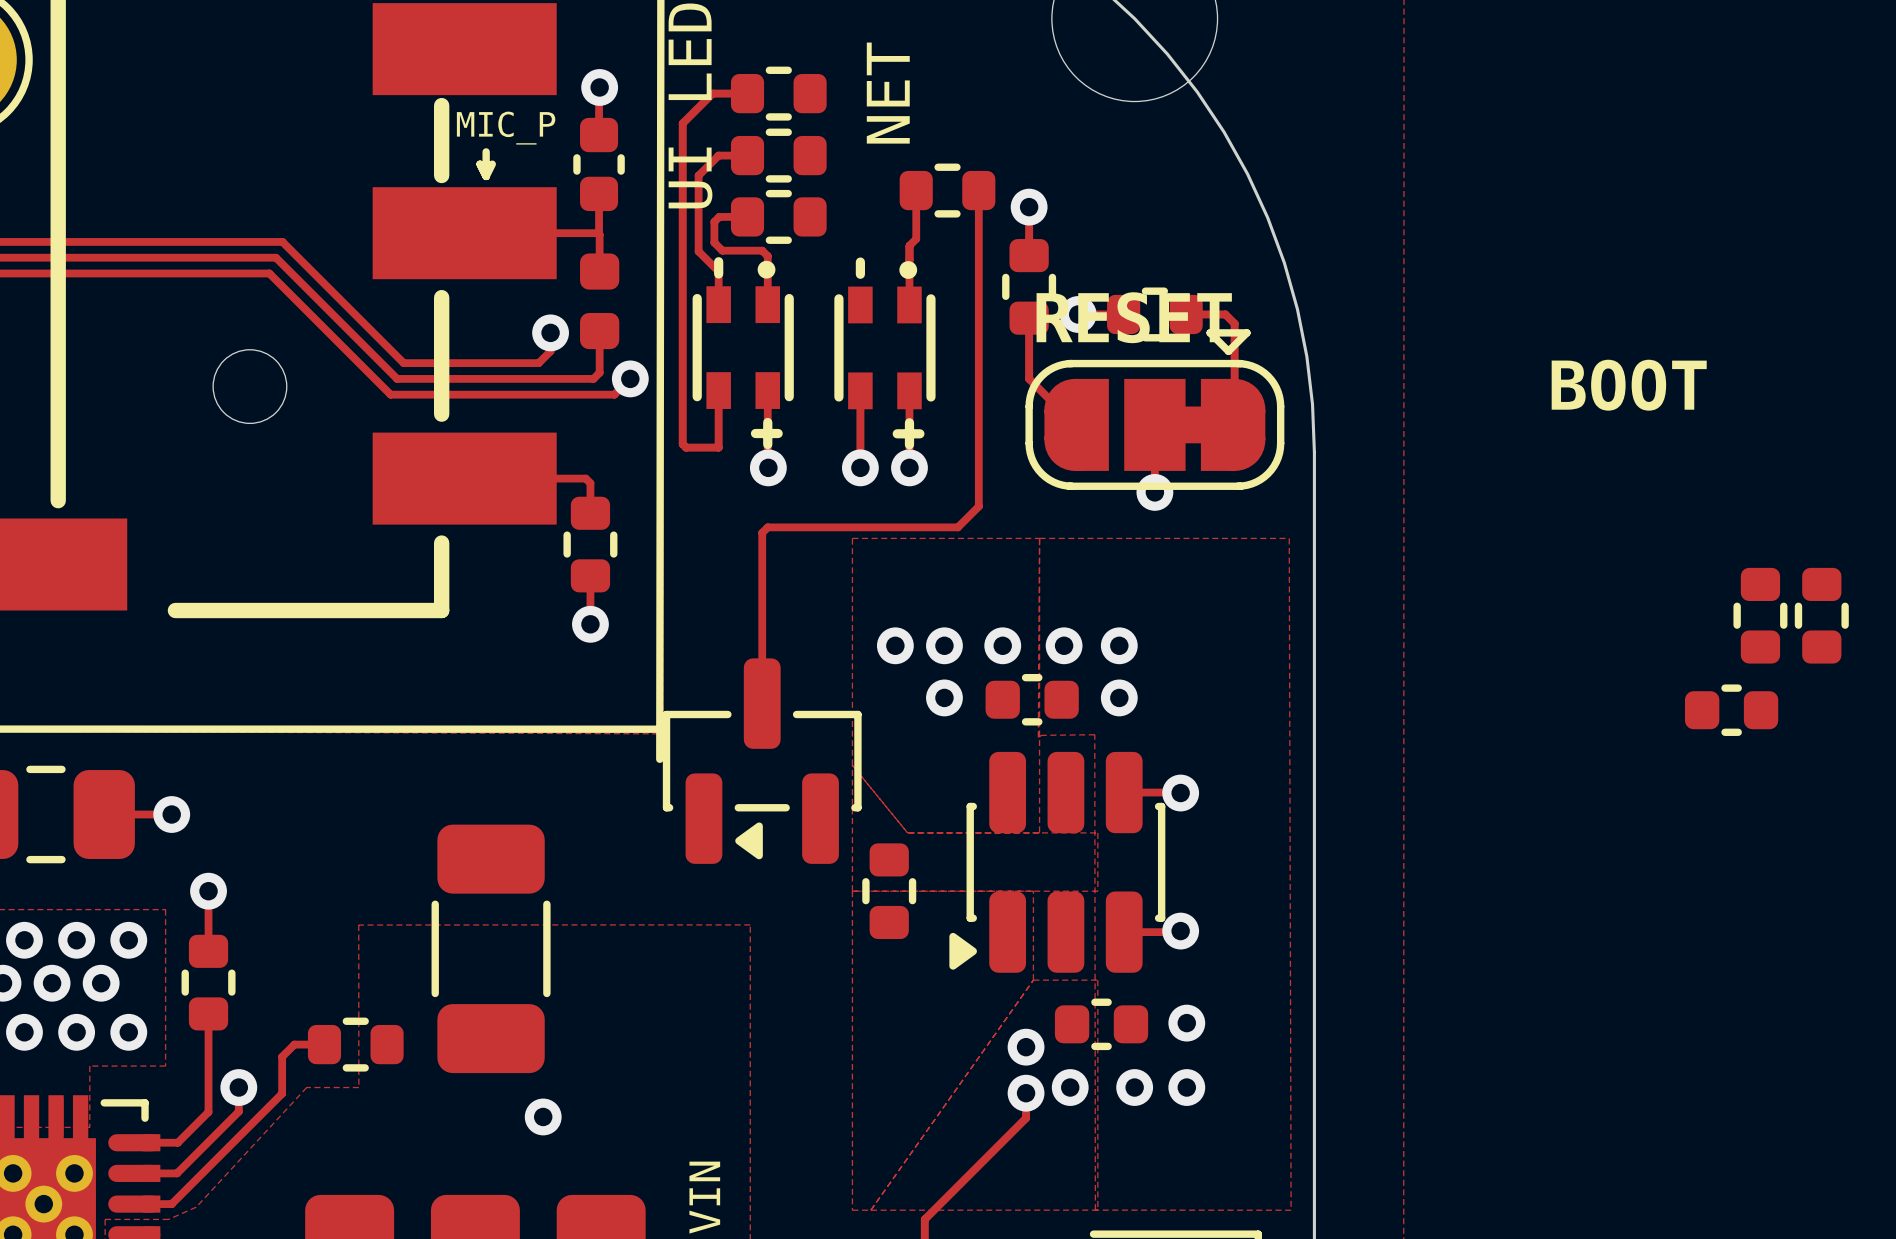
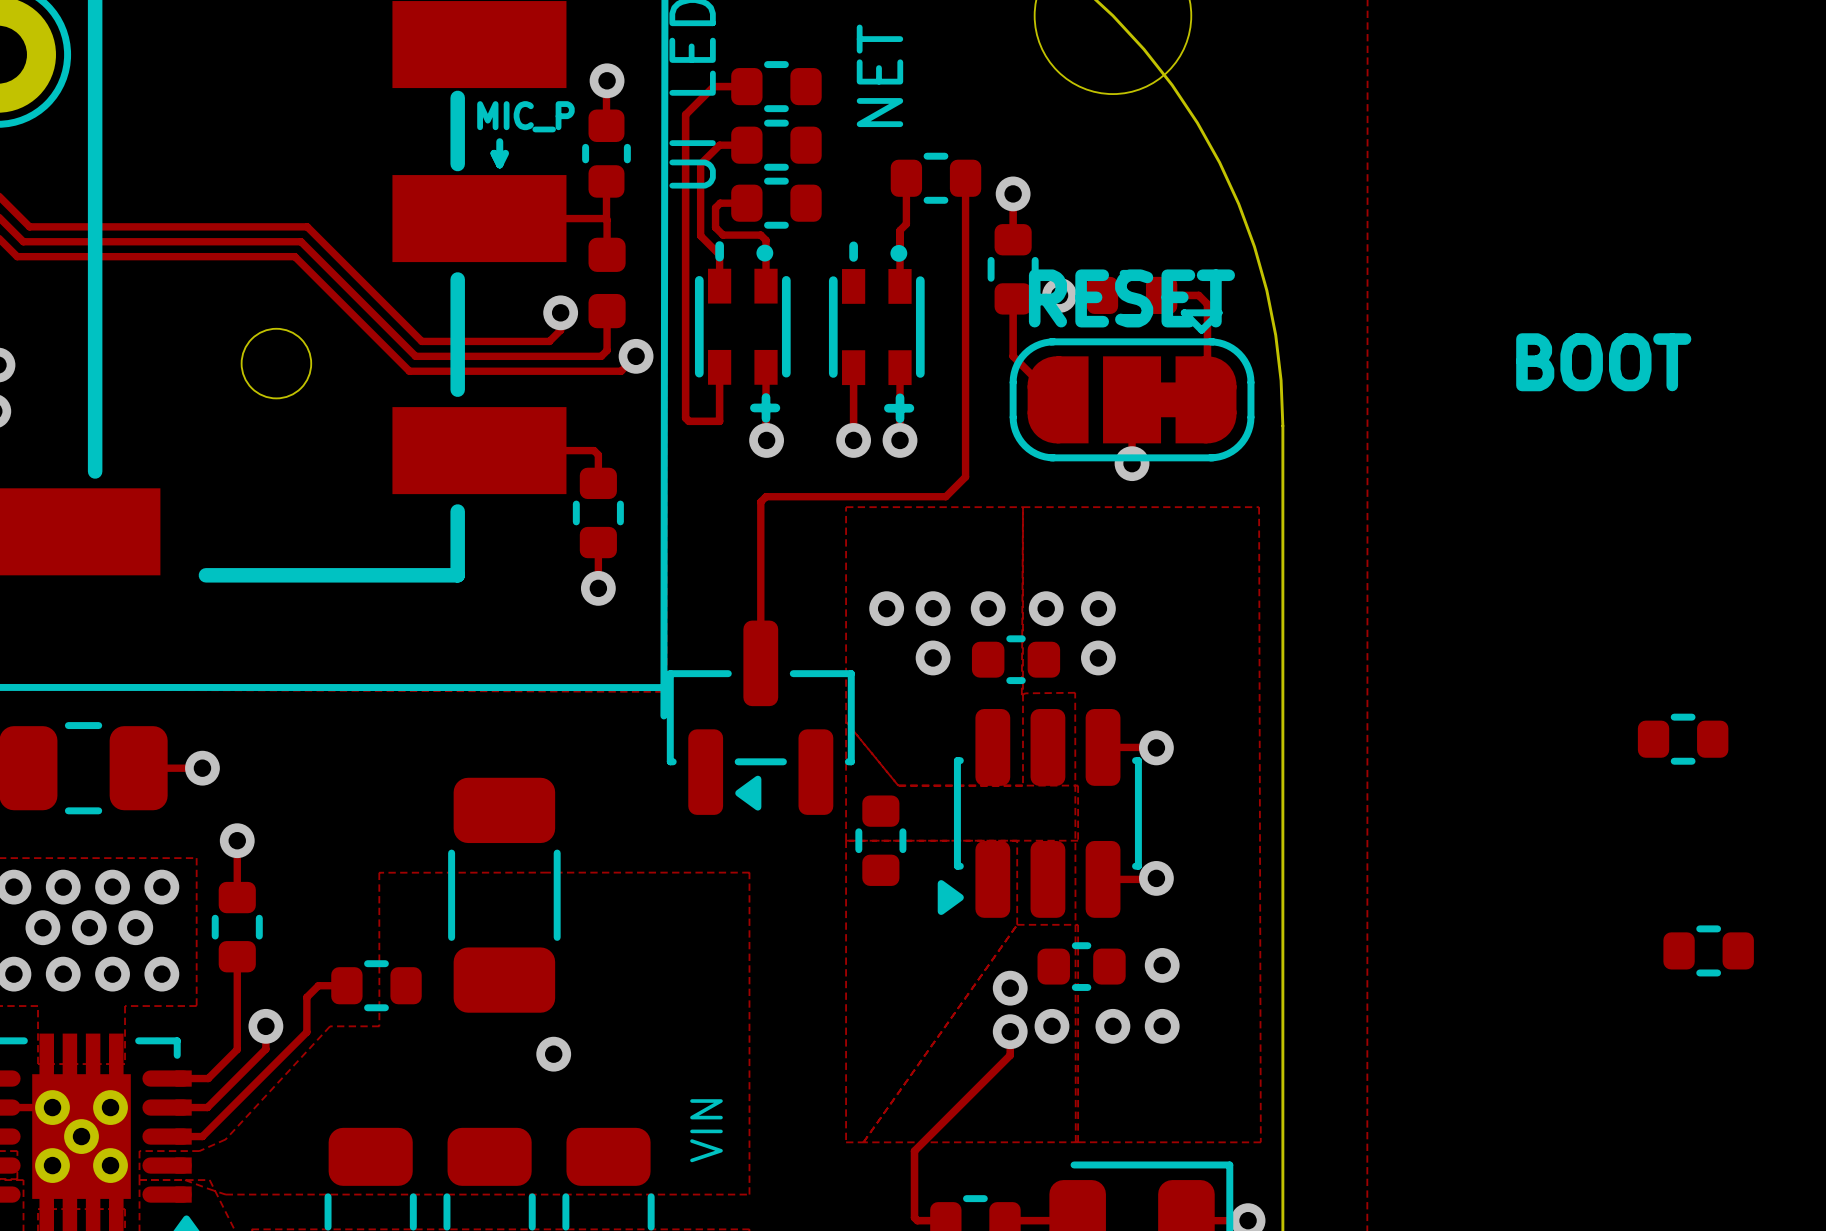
part: (1760, 615) -> none
part: (1821, 615) -> none
part: (1731, 710) -> none
part: none -> (1683, 739)
part: none -> (1708, 950)

